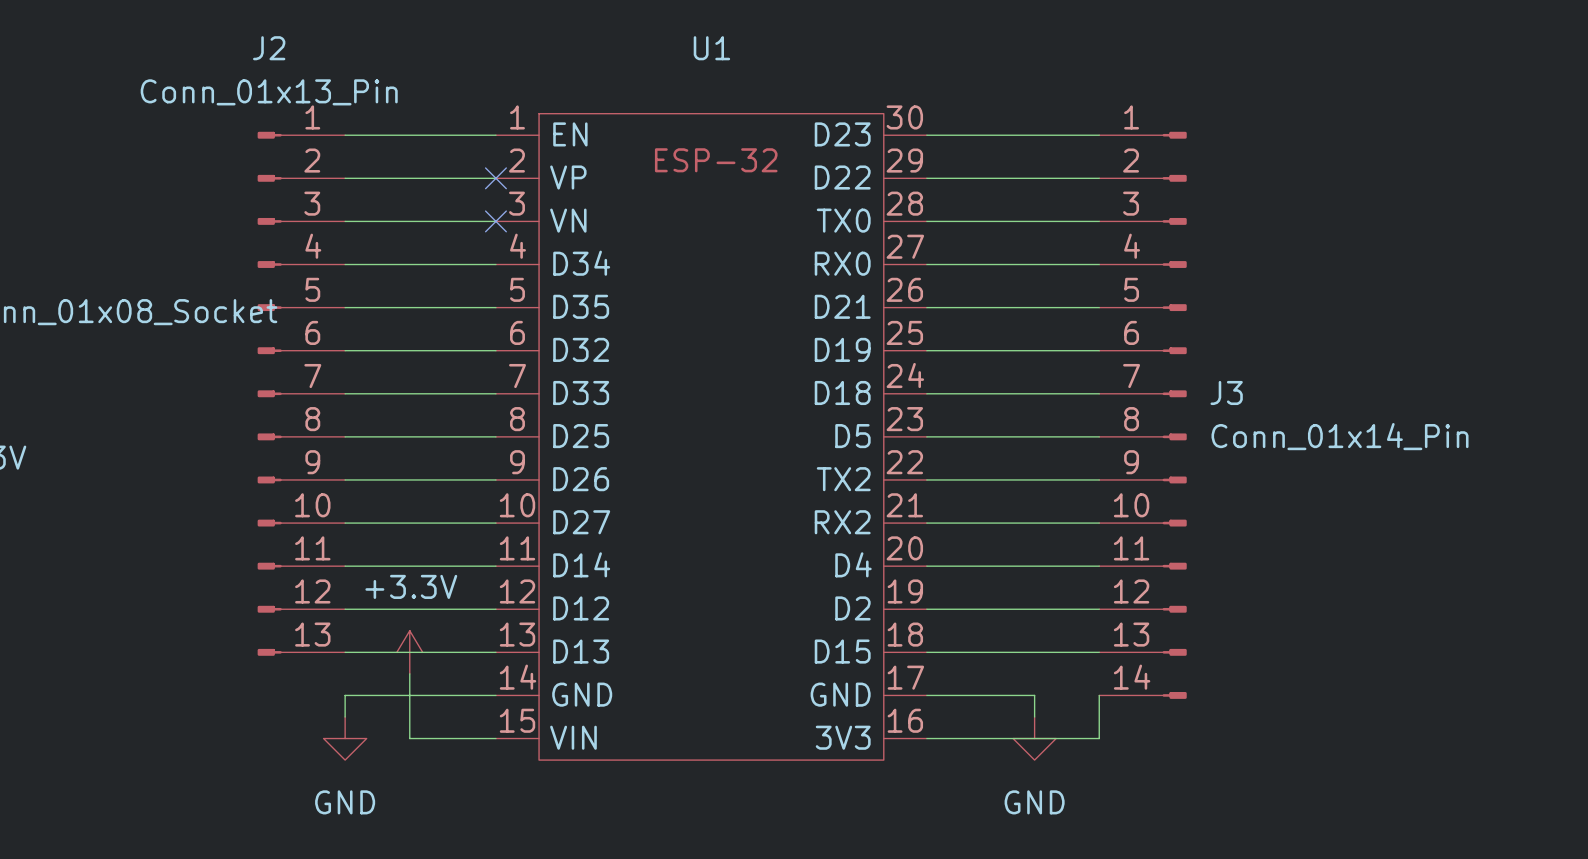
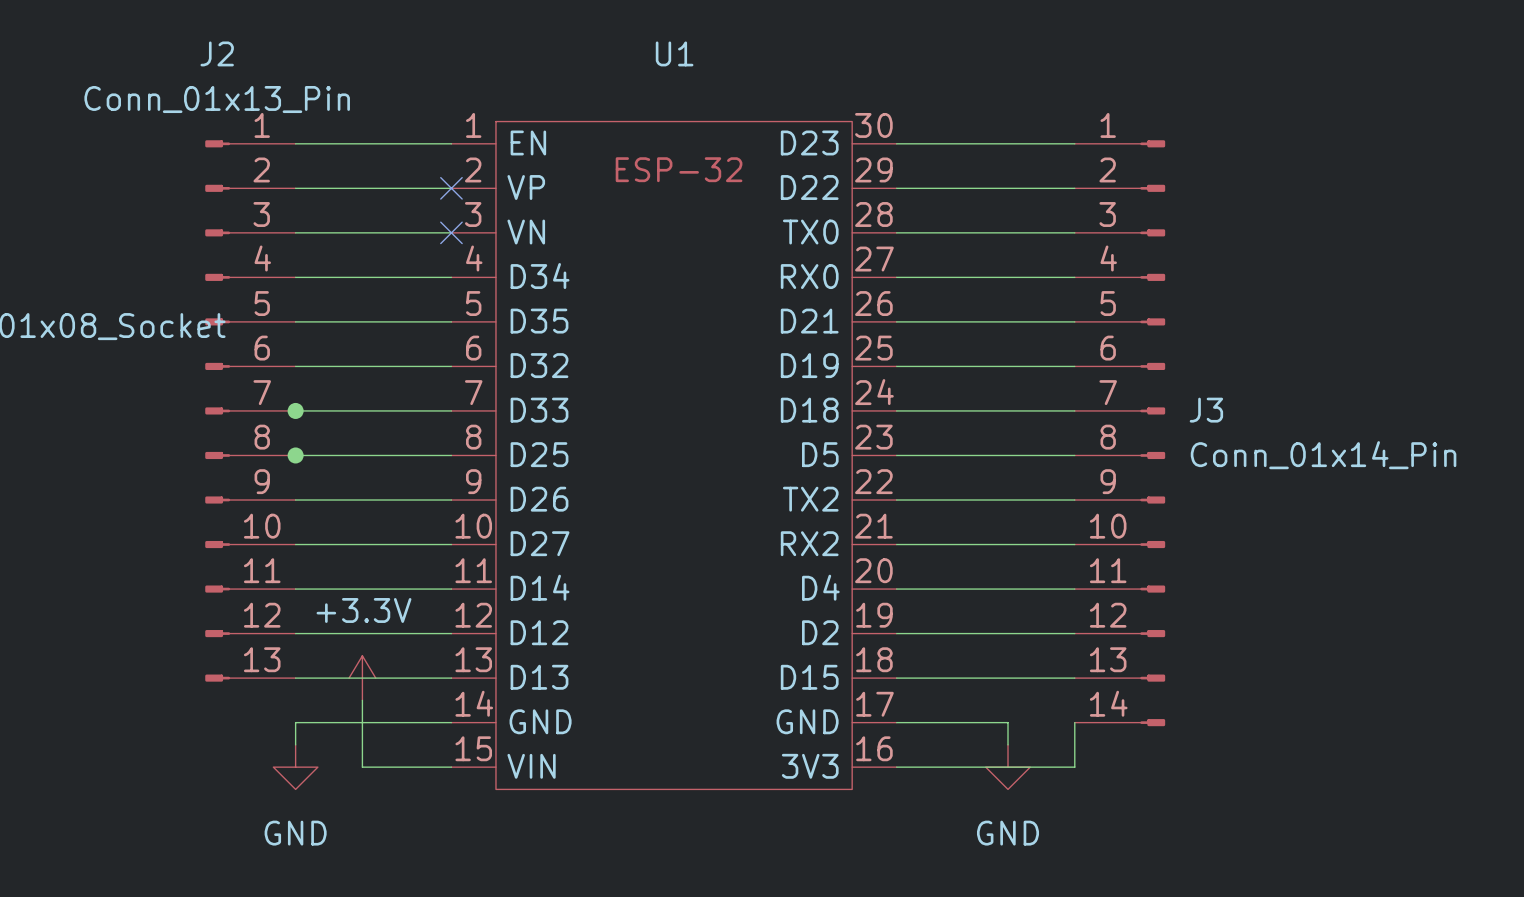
junction: none -> (295, 410)
junction: none -> (295, 455)

